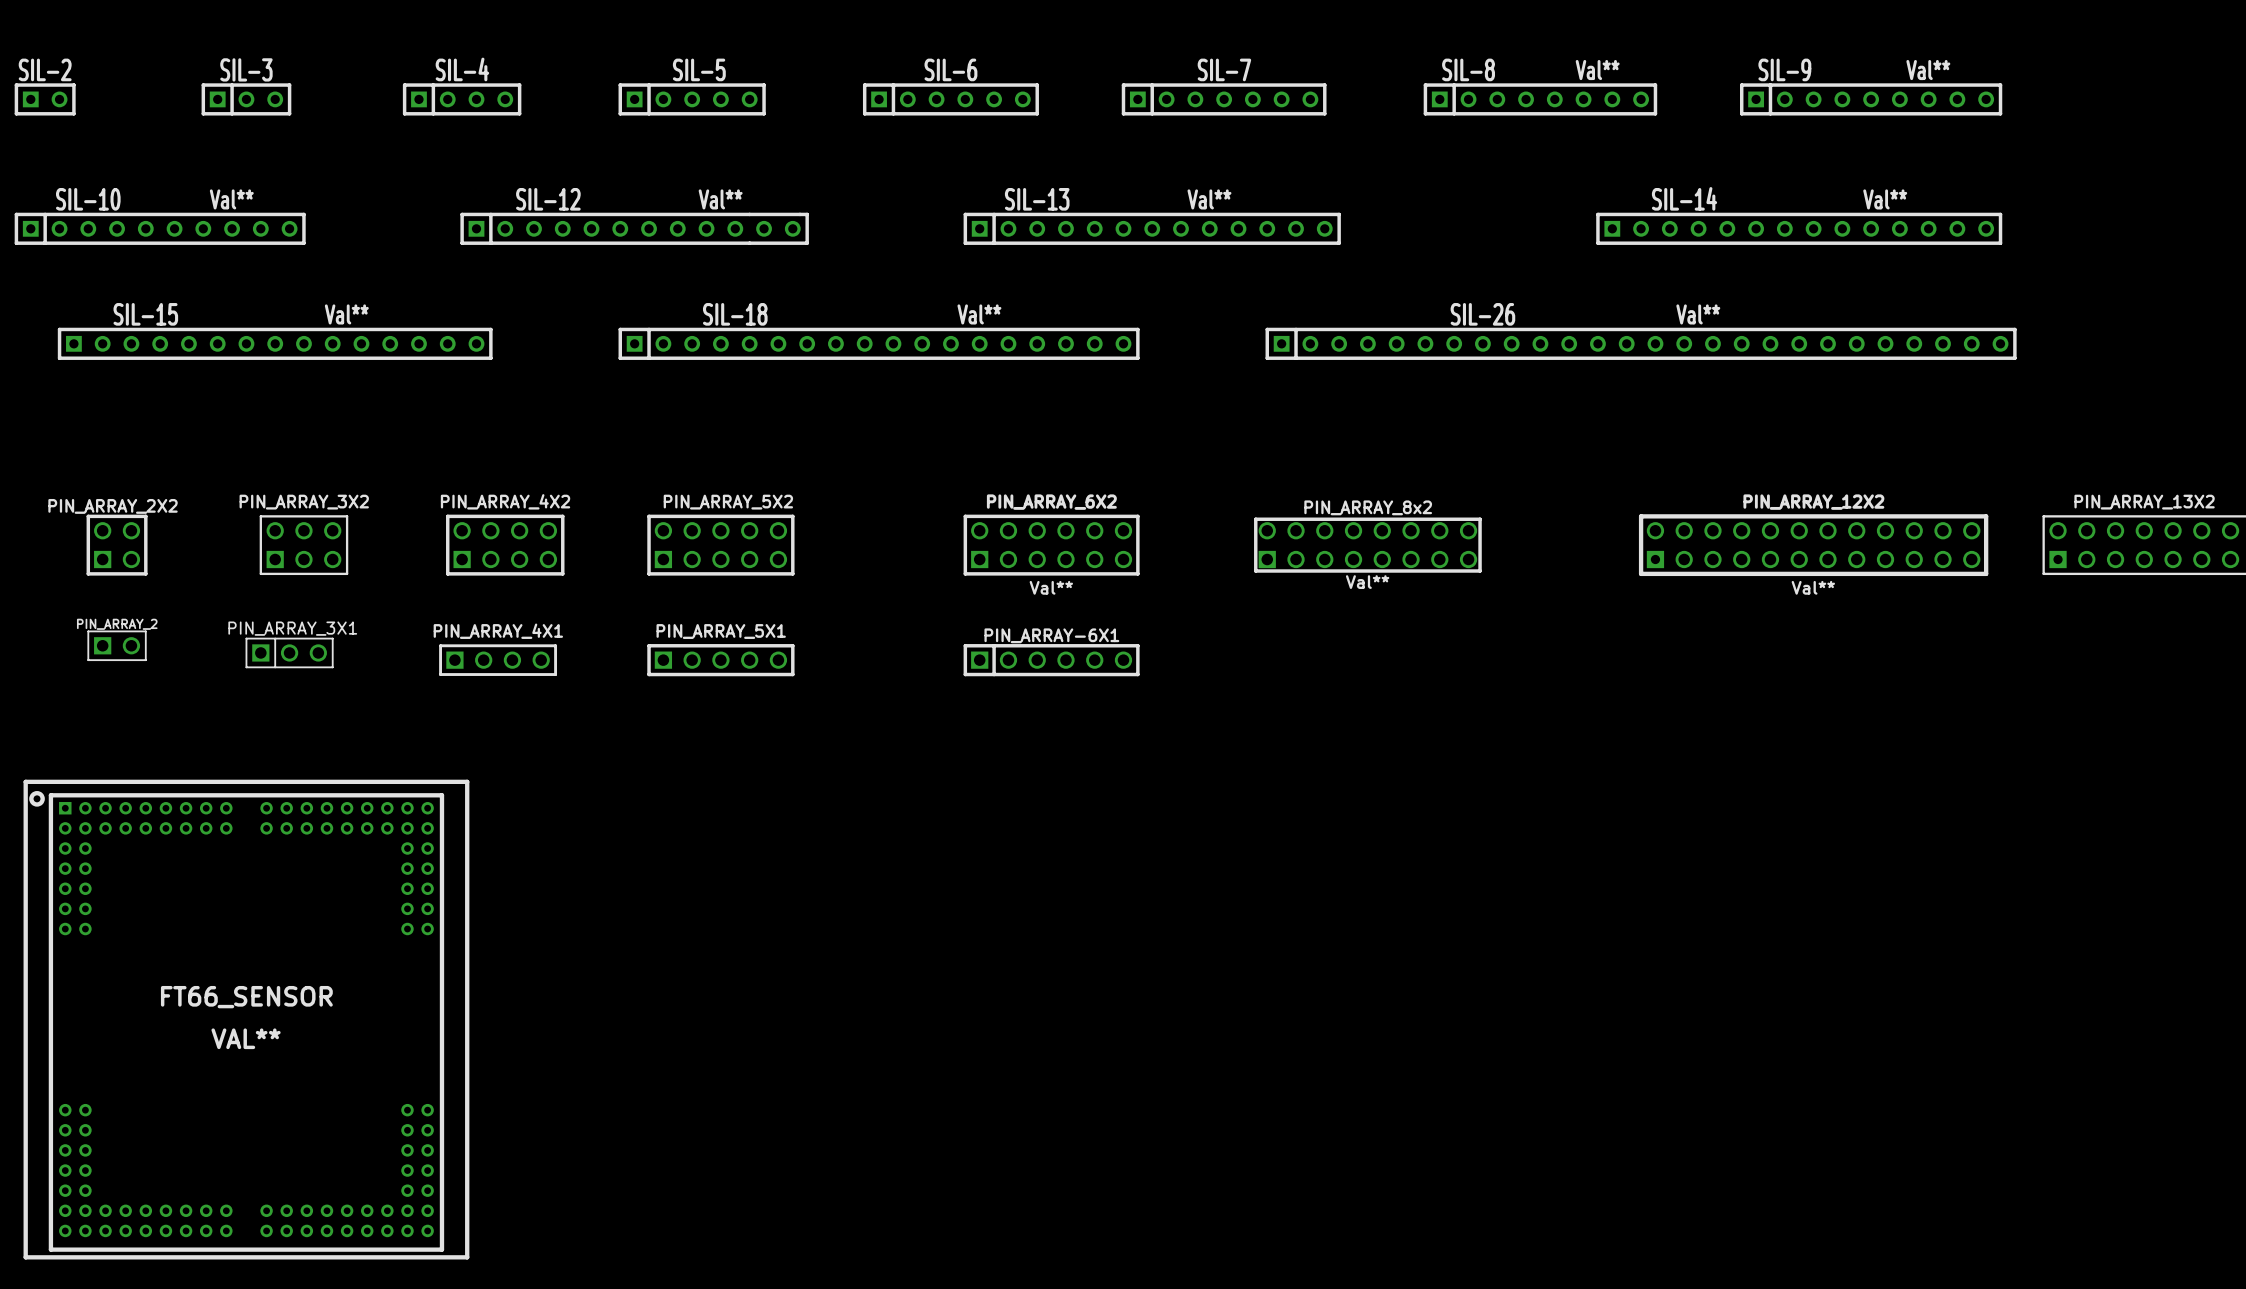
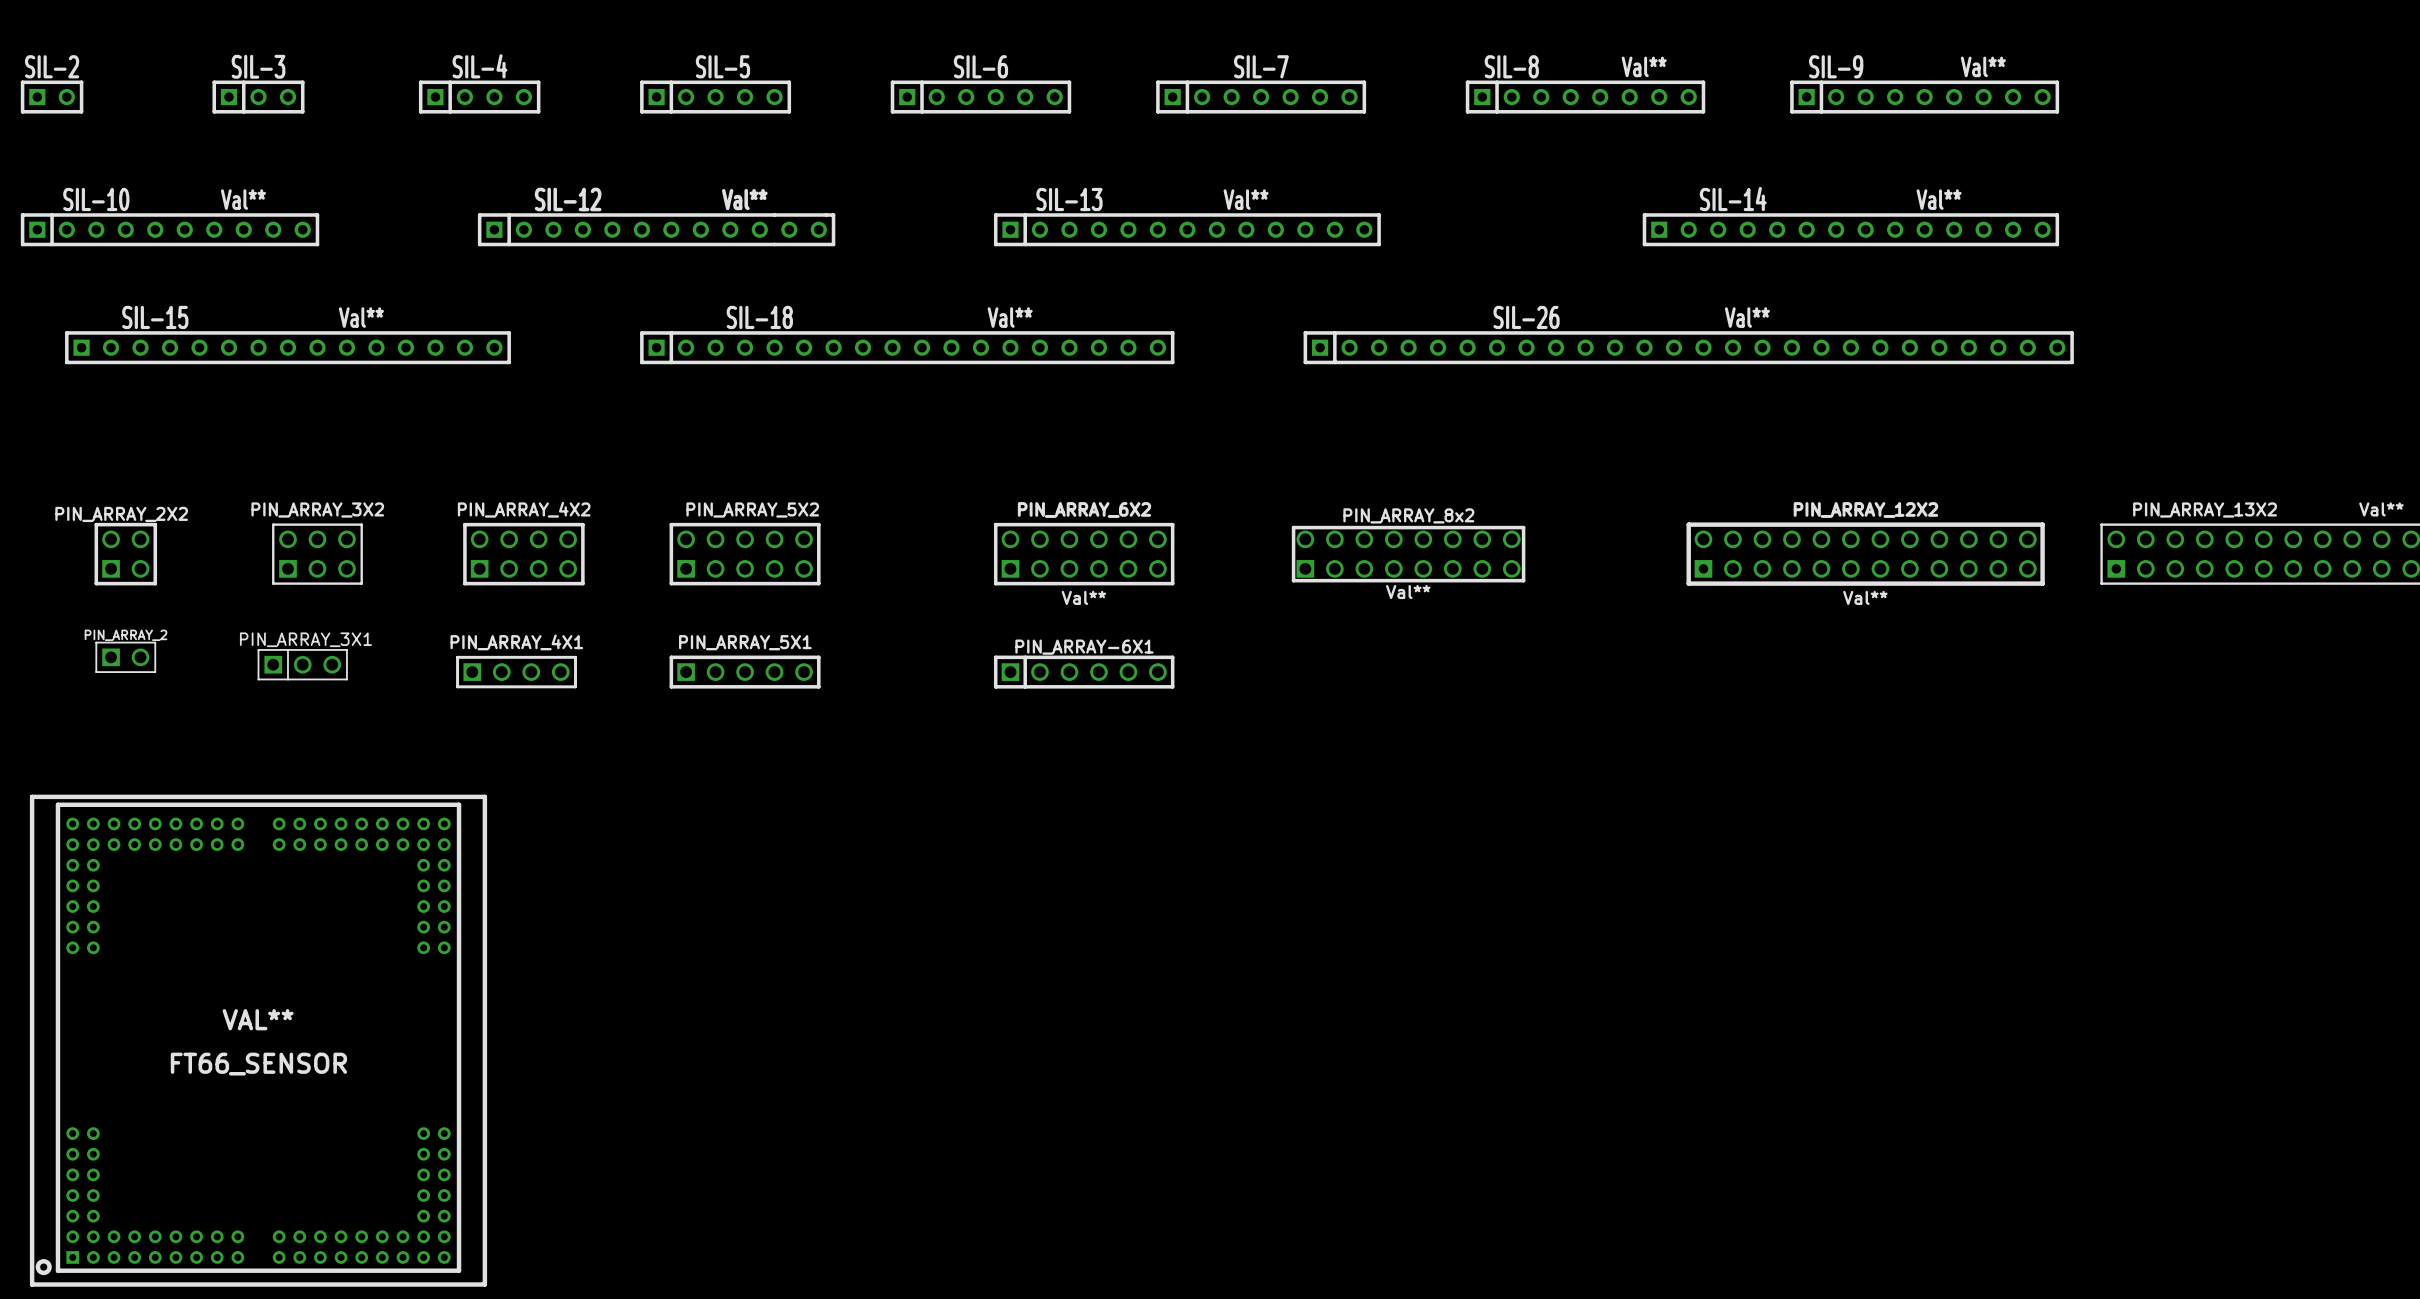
SIL-12 footprint: [460, 212, 809, 245] -> [477, 213, 836, 247]
FT66_SENSOR footprint: [23, 779, 470, 1260] -> [29, 794, 488, 1287]
FT66_SENSOR name position: FT66_SENSOR (246, 997) -> FT66_SENSOR (258, 1064)
FT66_SENSOR value position: VAL** (246, 1038) -> VAL** (258, 1019)

